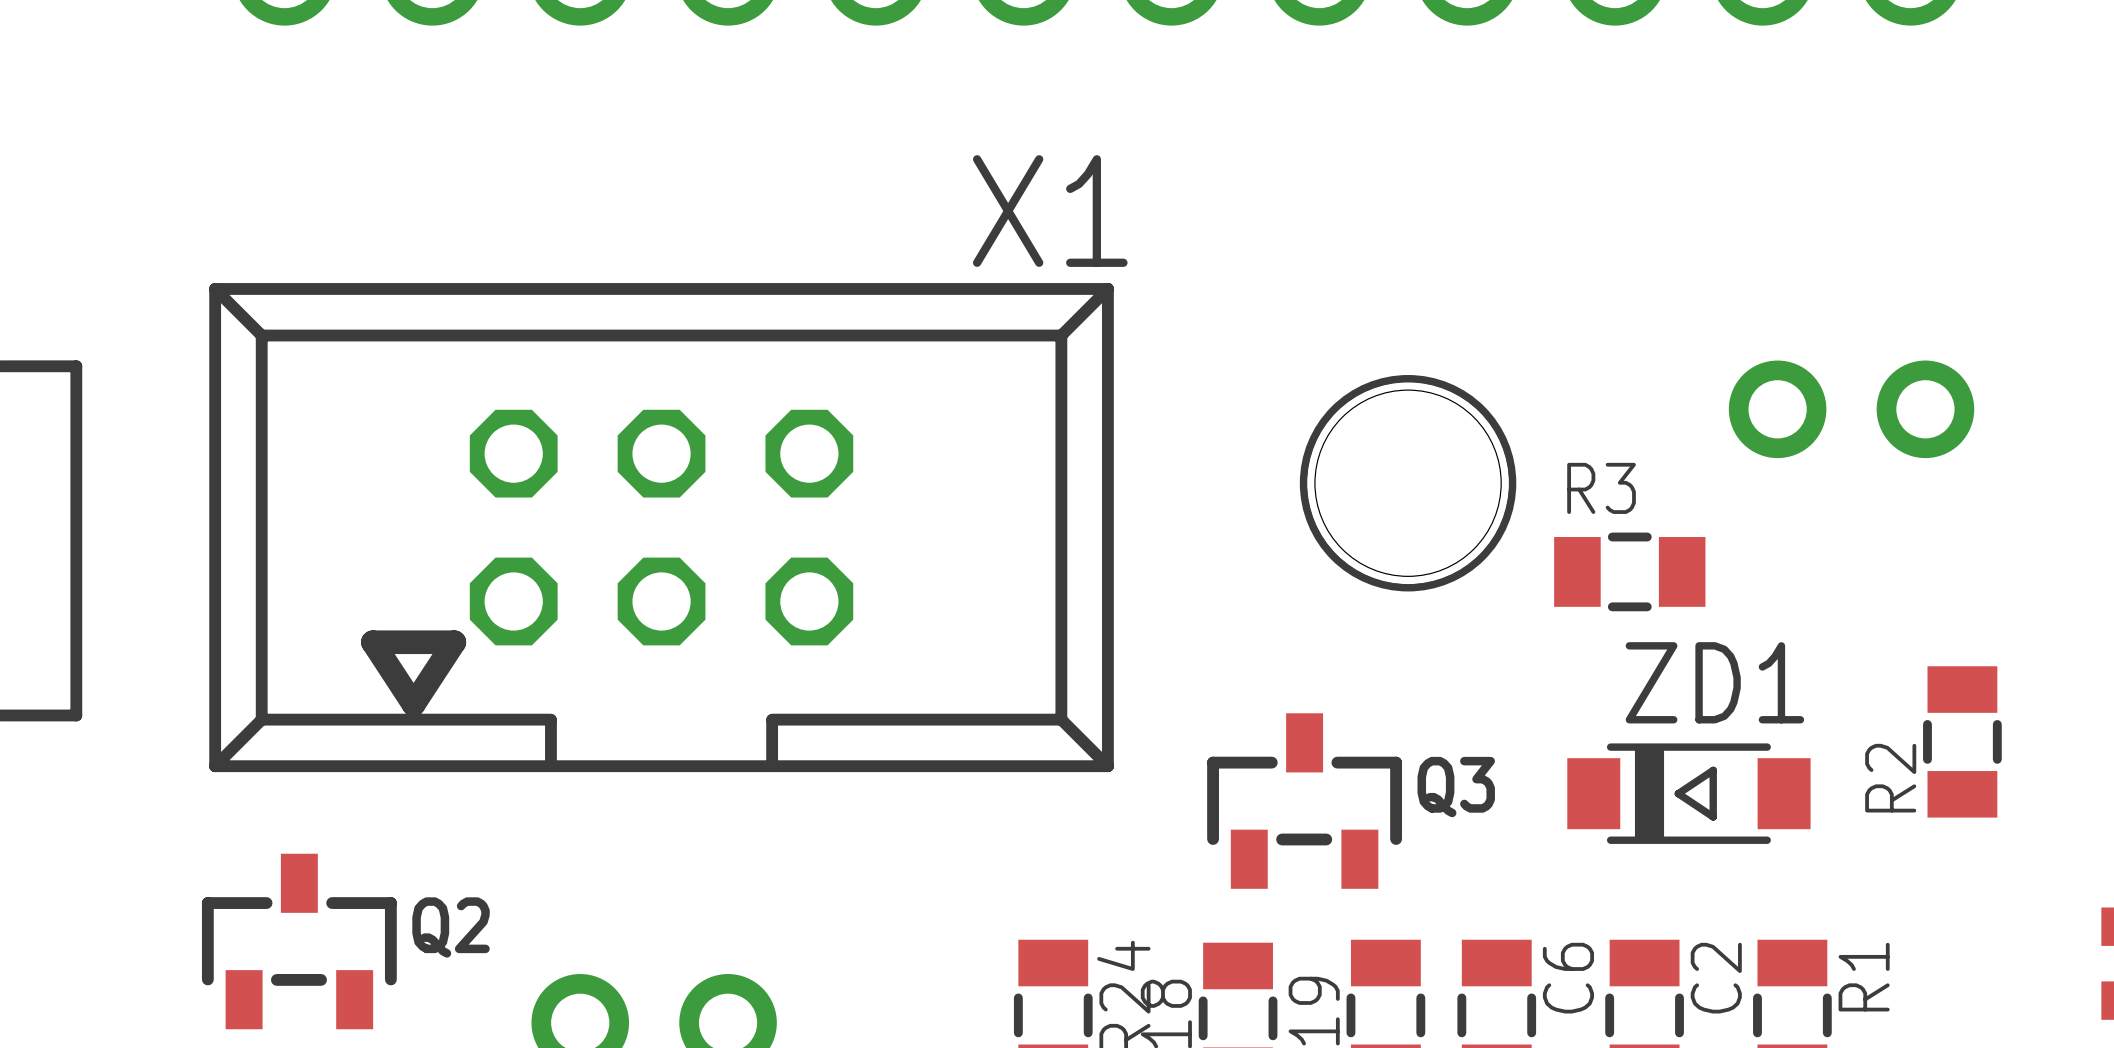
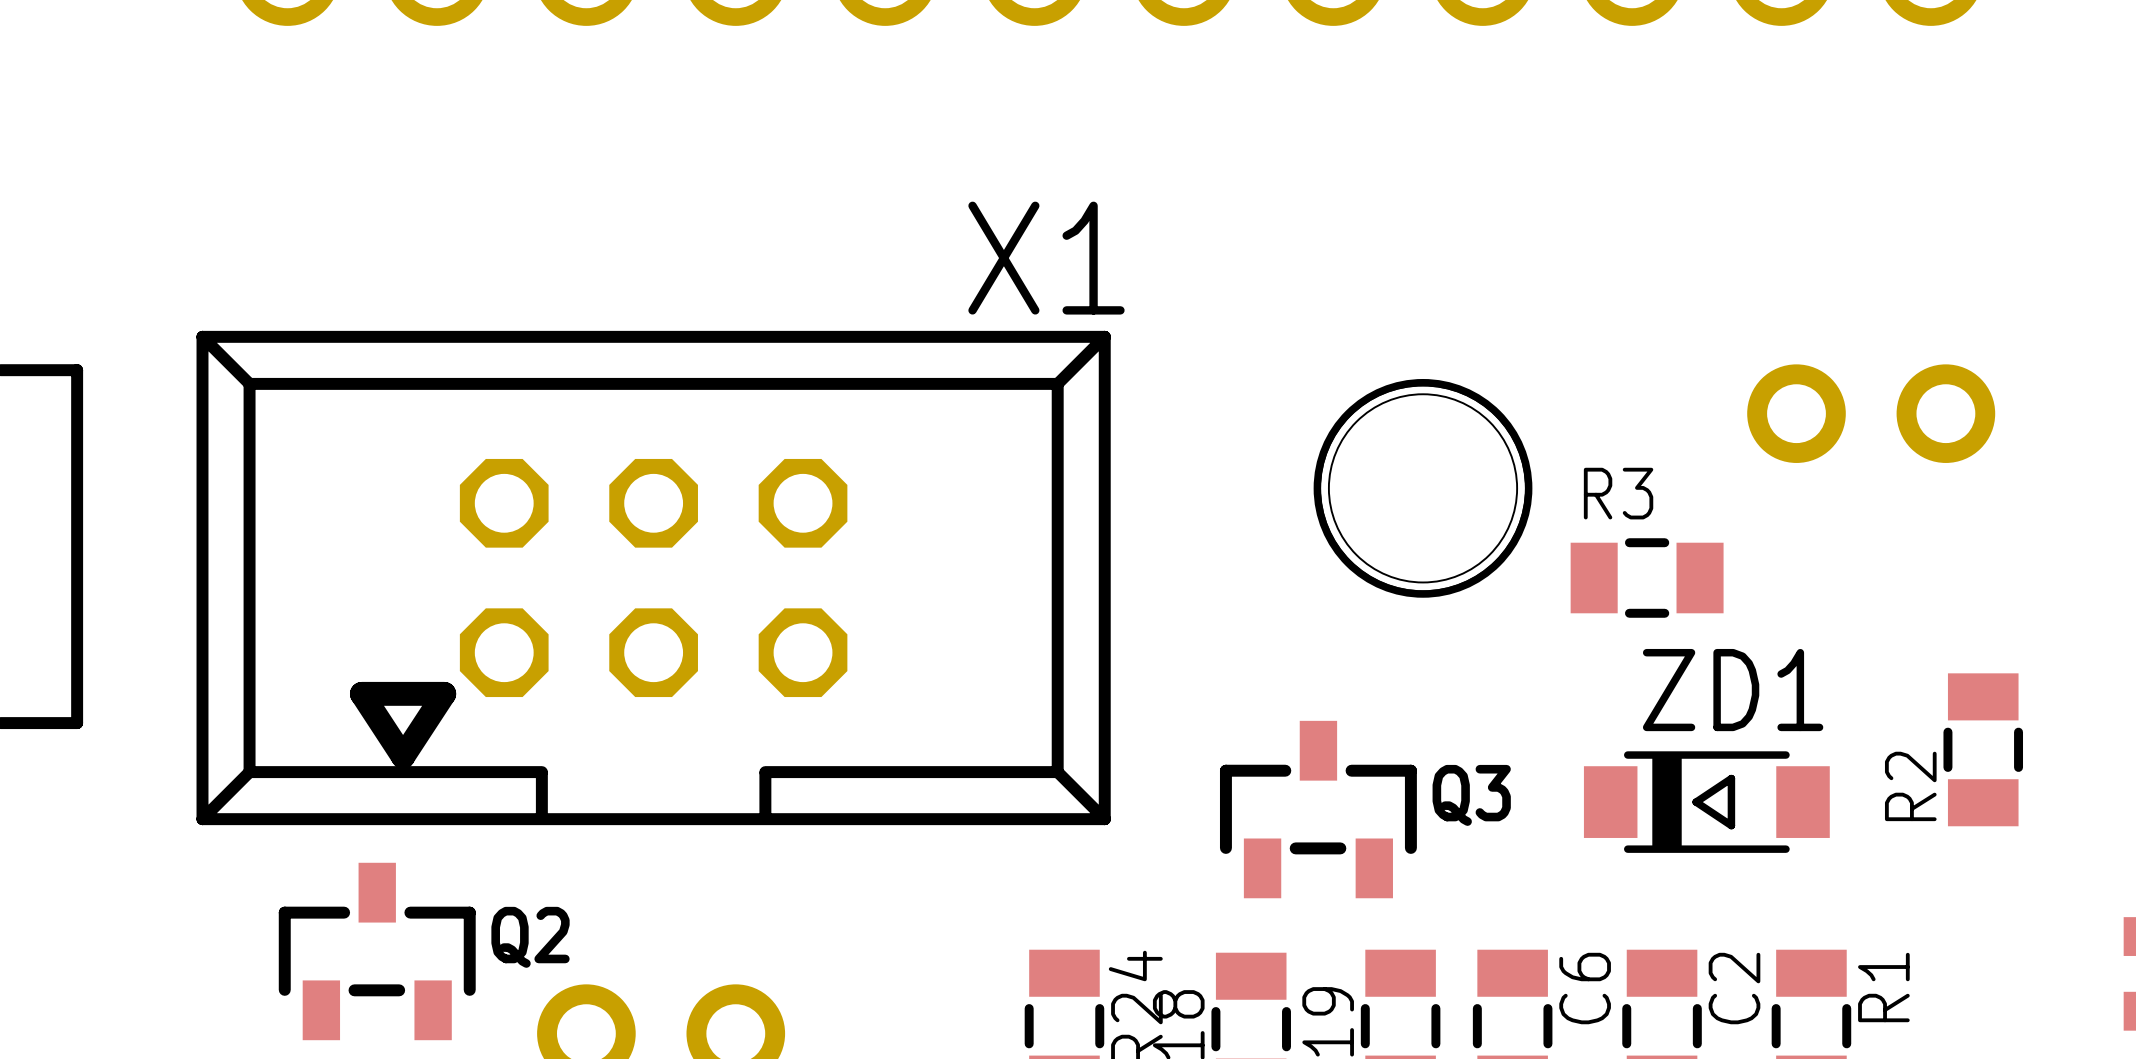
X1 position: (661, 527) -> (653, 578)
Q2 position: (299, 941) -> (377, 951)

